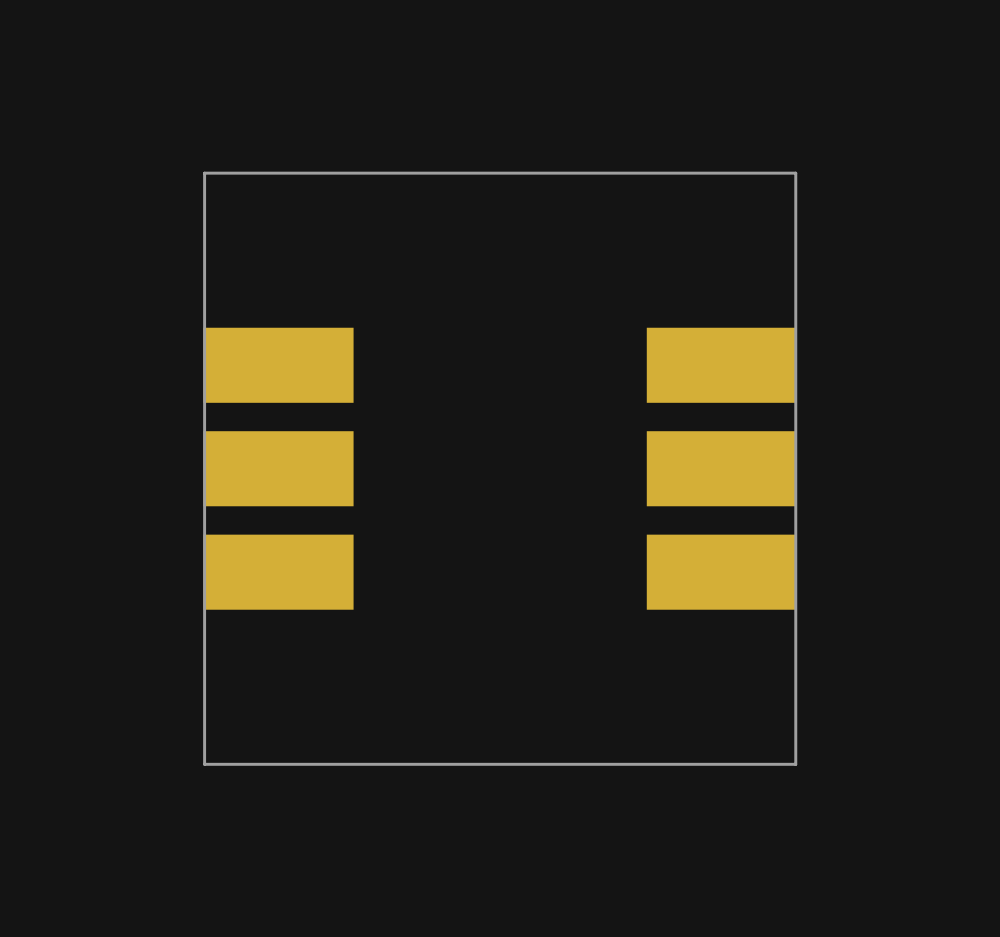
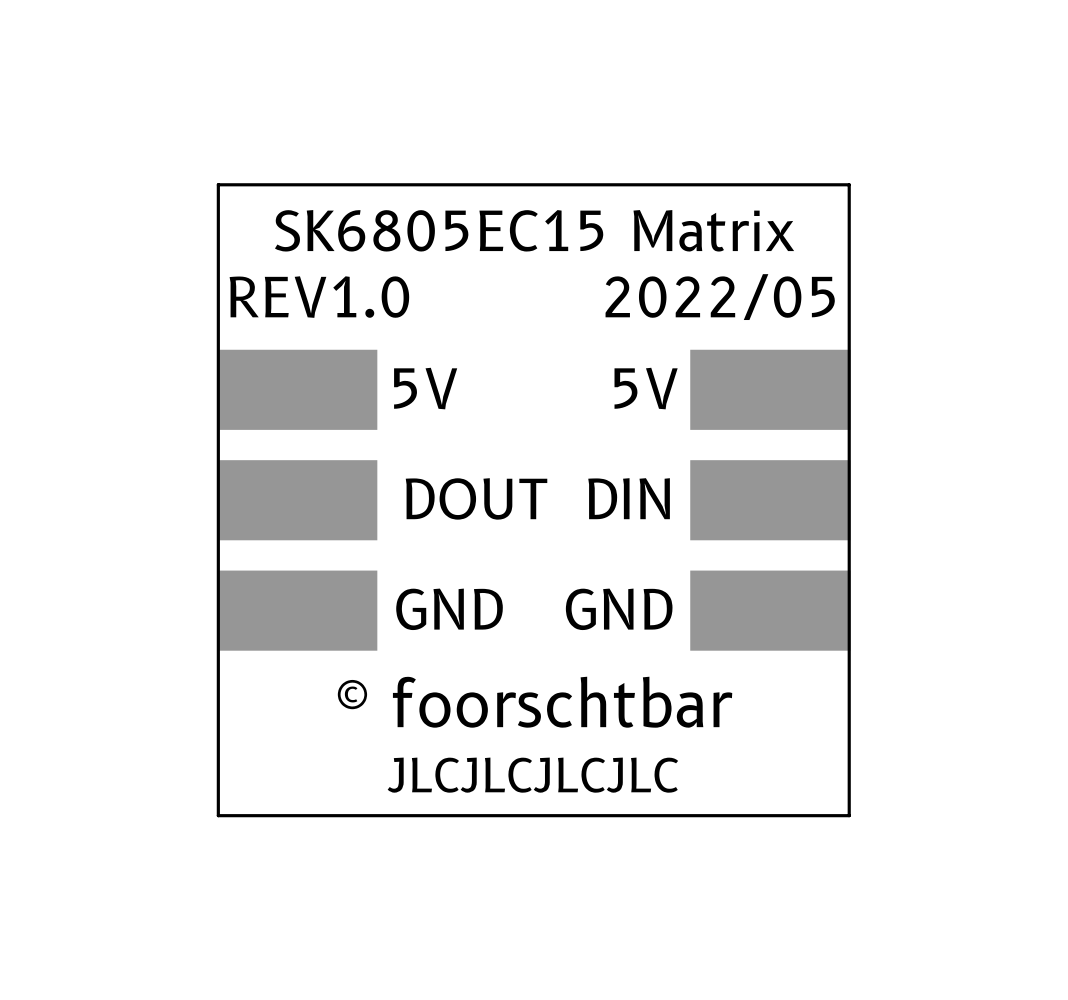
text: none -> SK6805EC15 Matrix (534, 230)
text: none -> REV1.0 (319, 297)
text: none -> 2022/05 (720, 297)
text: none -> 5V (425, 388)
text: none -> 5V (646, 388)
text: none -> DOUT (476, 498)
text: none -> DIN (629, 498)
text: none -> GND (449, 609)
text: none -> GND (619, 609)
text: none -> © foorschtbar (535, 702)
text: none -> JLCJLCJLCJLC (532, 775)

